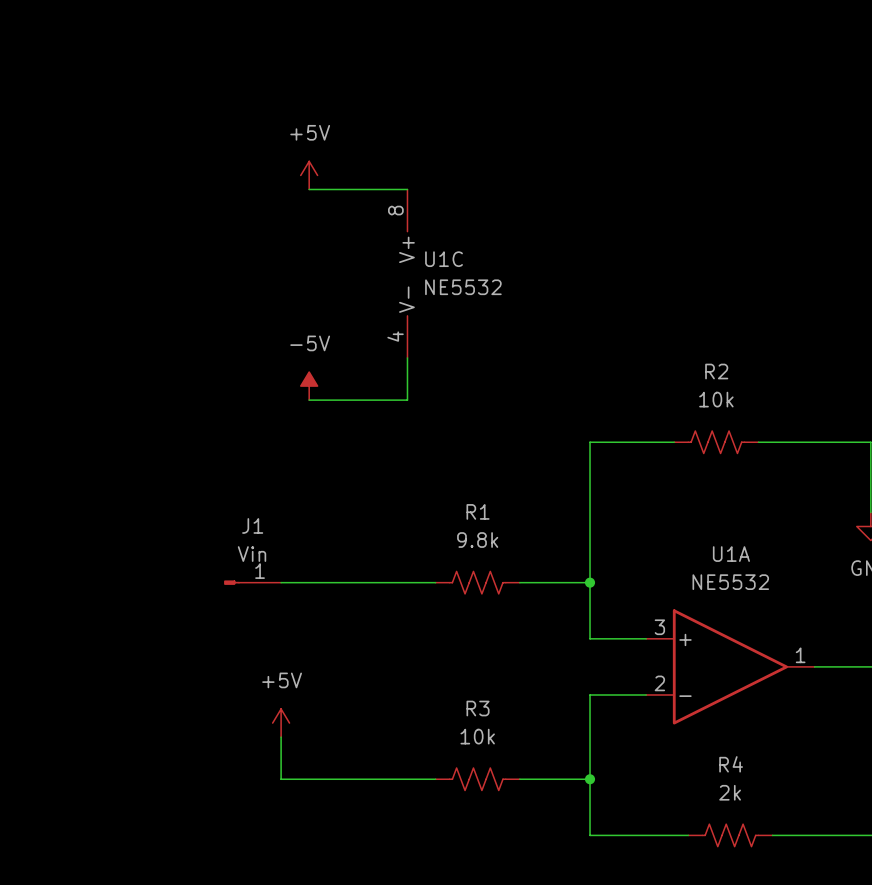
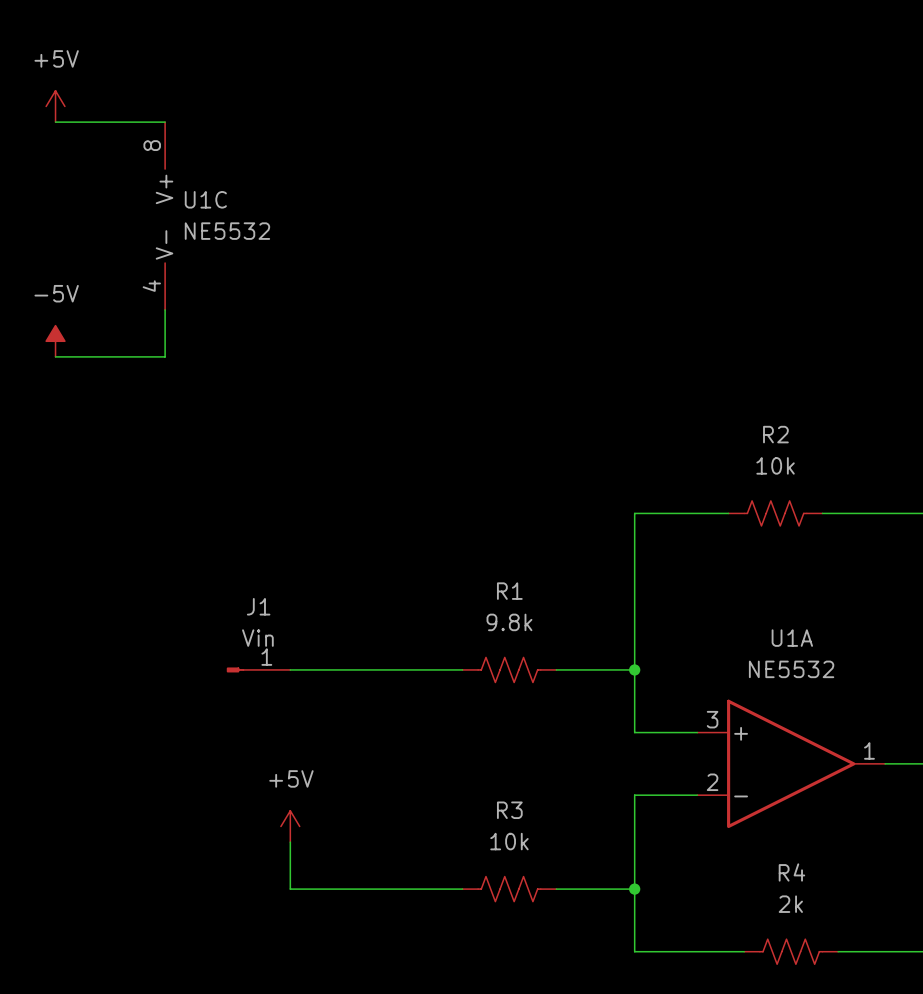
power symbol position: +5V (309, 175) -> +5V (55, 106)
wire: (309, 189) (407, 189) -> (55, 122) (165, 122)
U1C position: (407, 273) -> (165, 216)
wire: (407, 357) (407, 400) (309, 400) -> (165, 309) (165, 356) (55, 356)
power symbol position: -5V (309, 386) -> -5V (55, 341)

